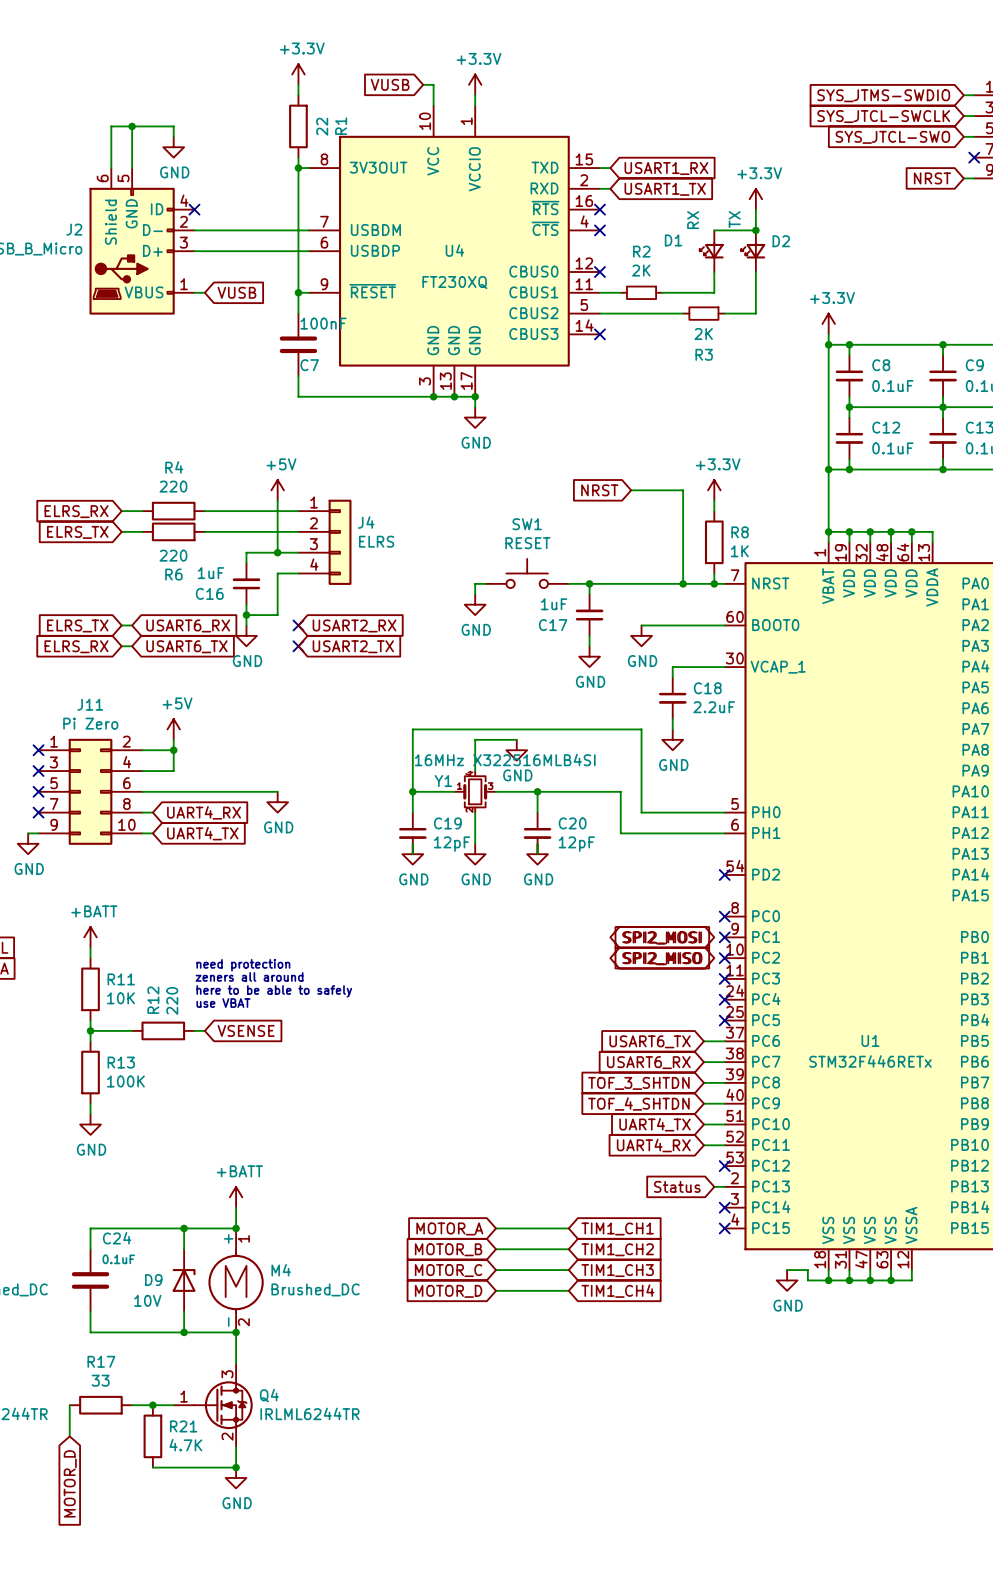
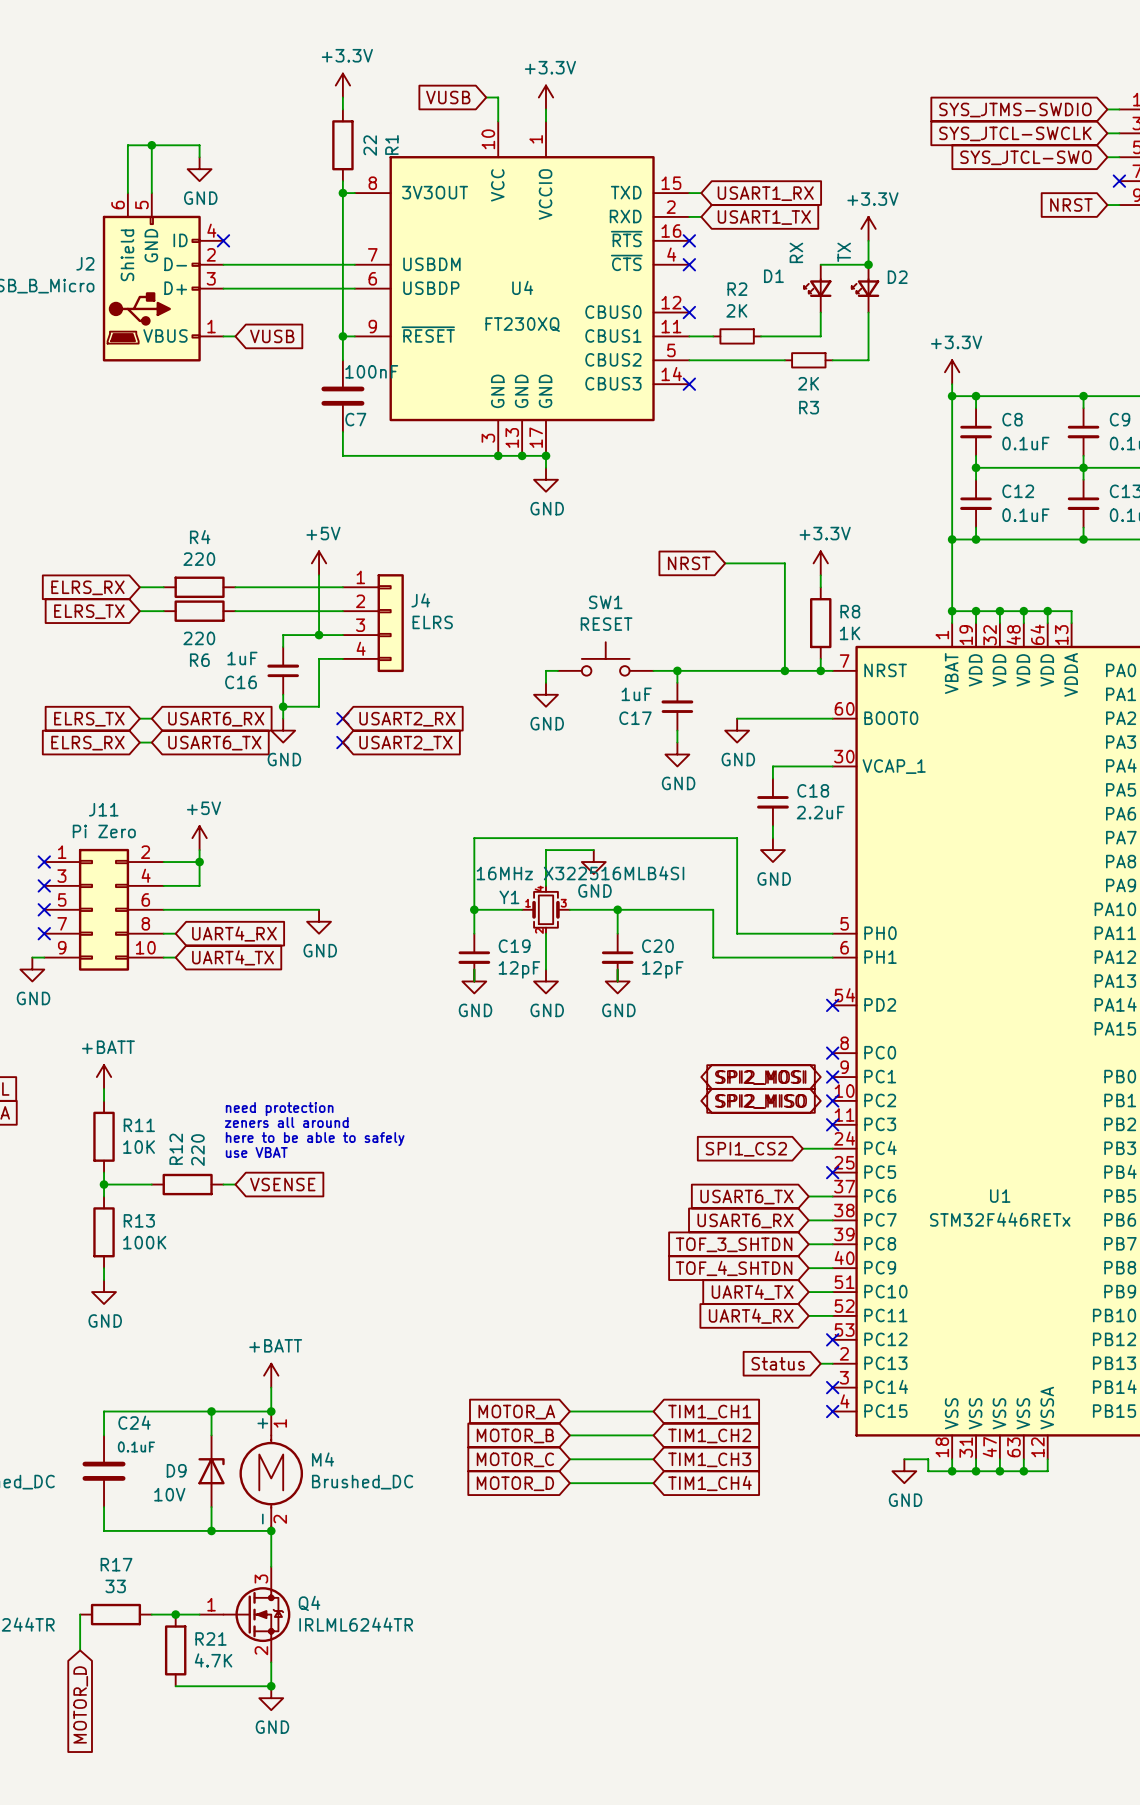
wire: none -> (802, 1148) (832, 1148)
no-connect mark: (724, 999) -> none
global label: none -> SPI1_CS2 (746, 1149)

